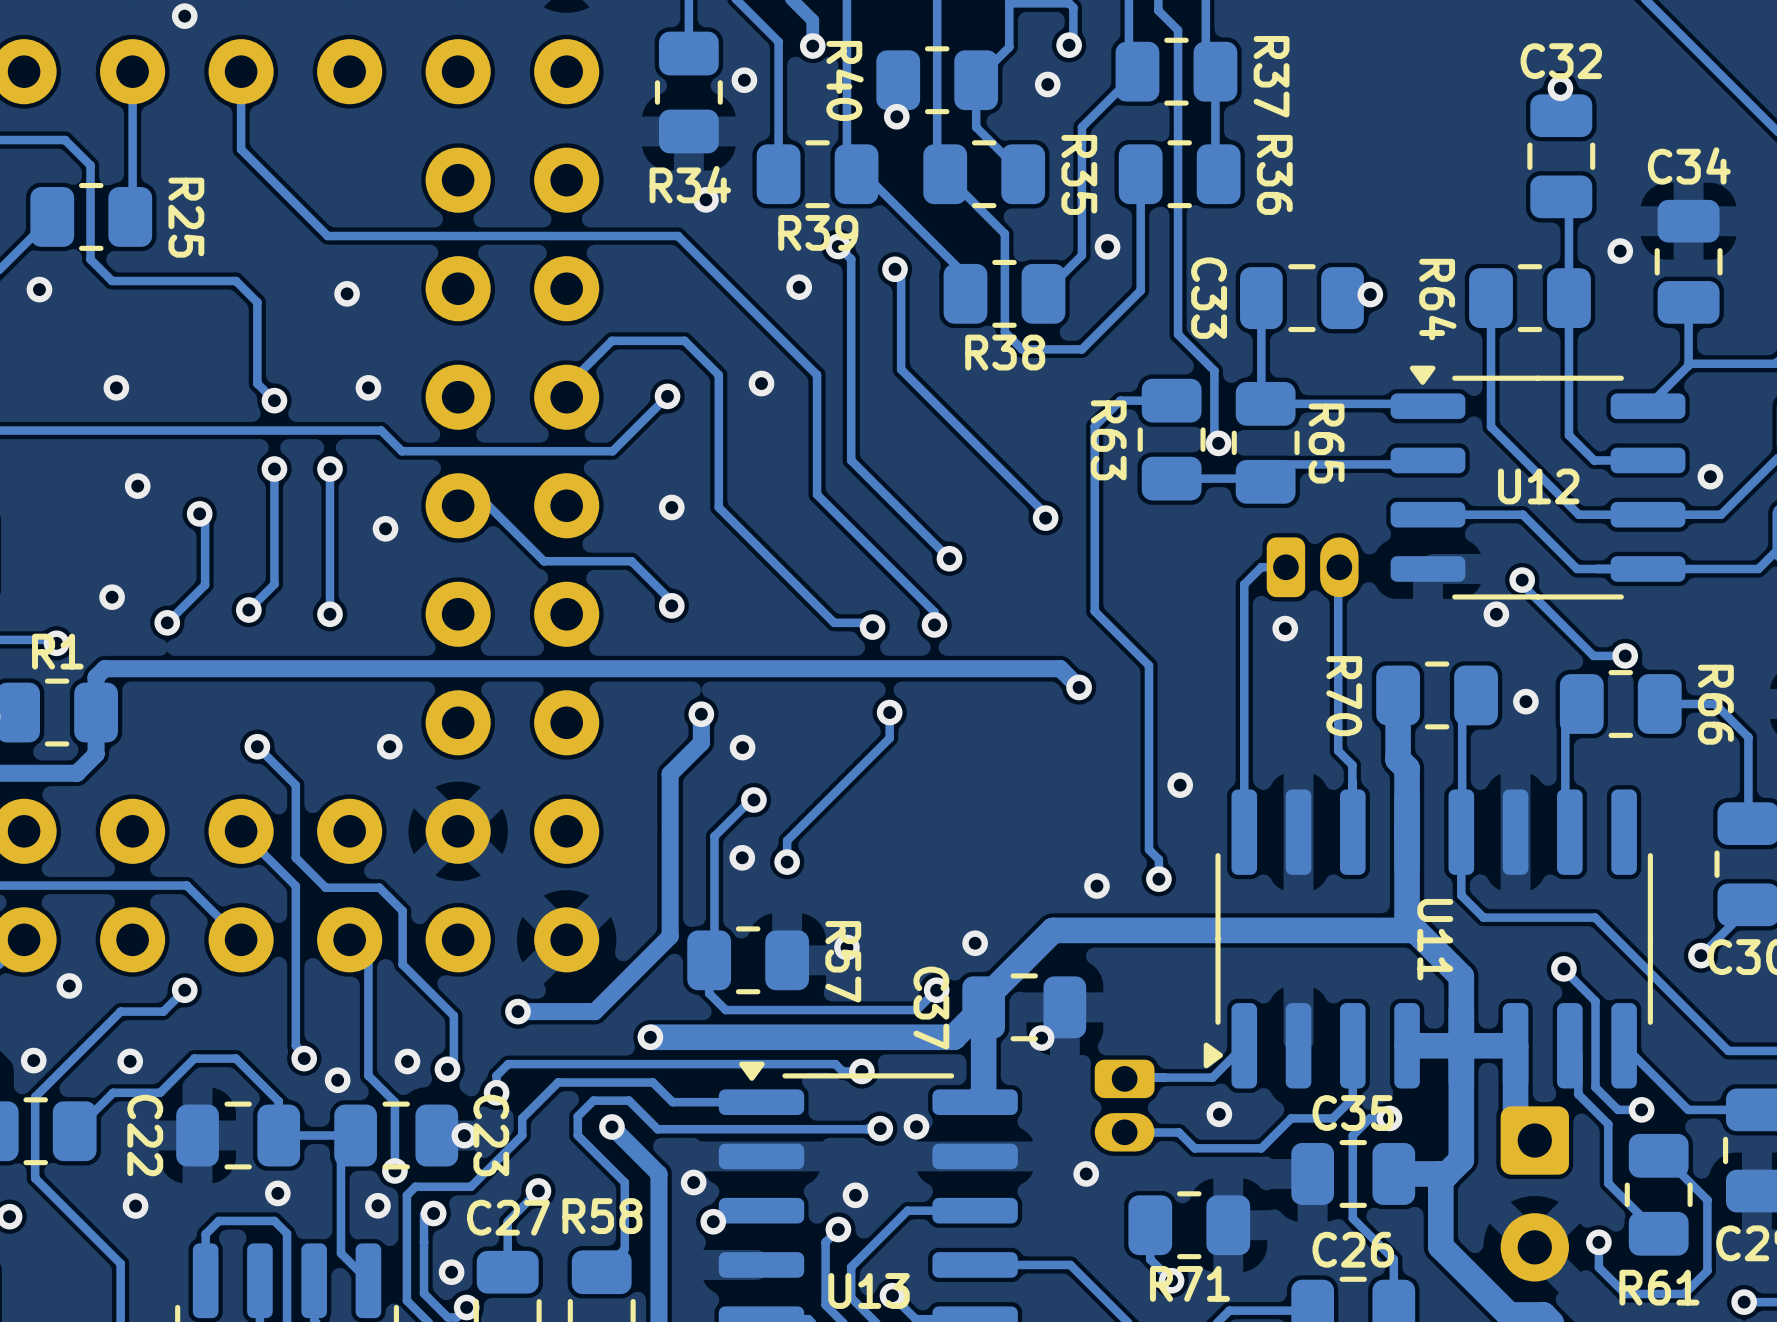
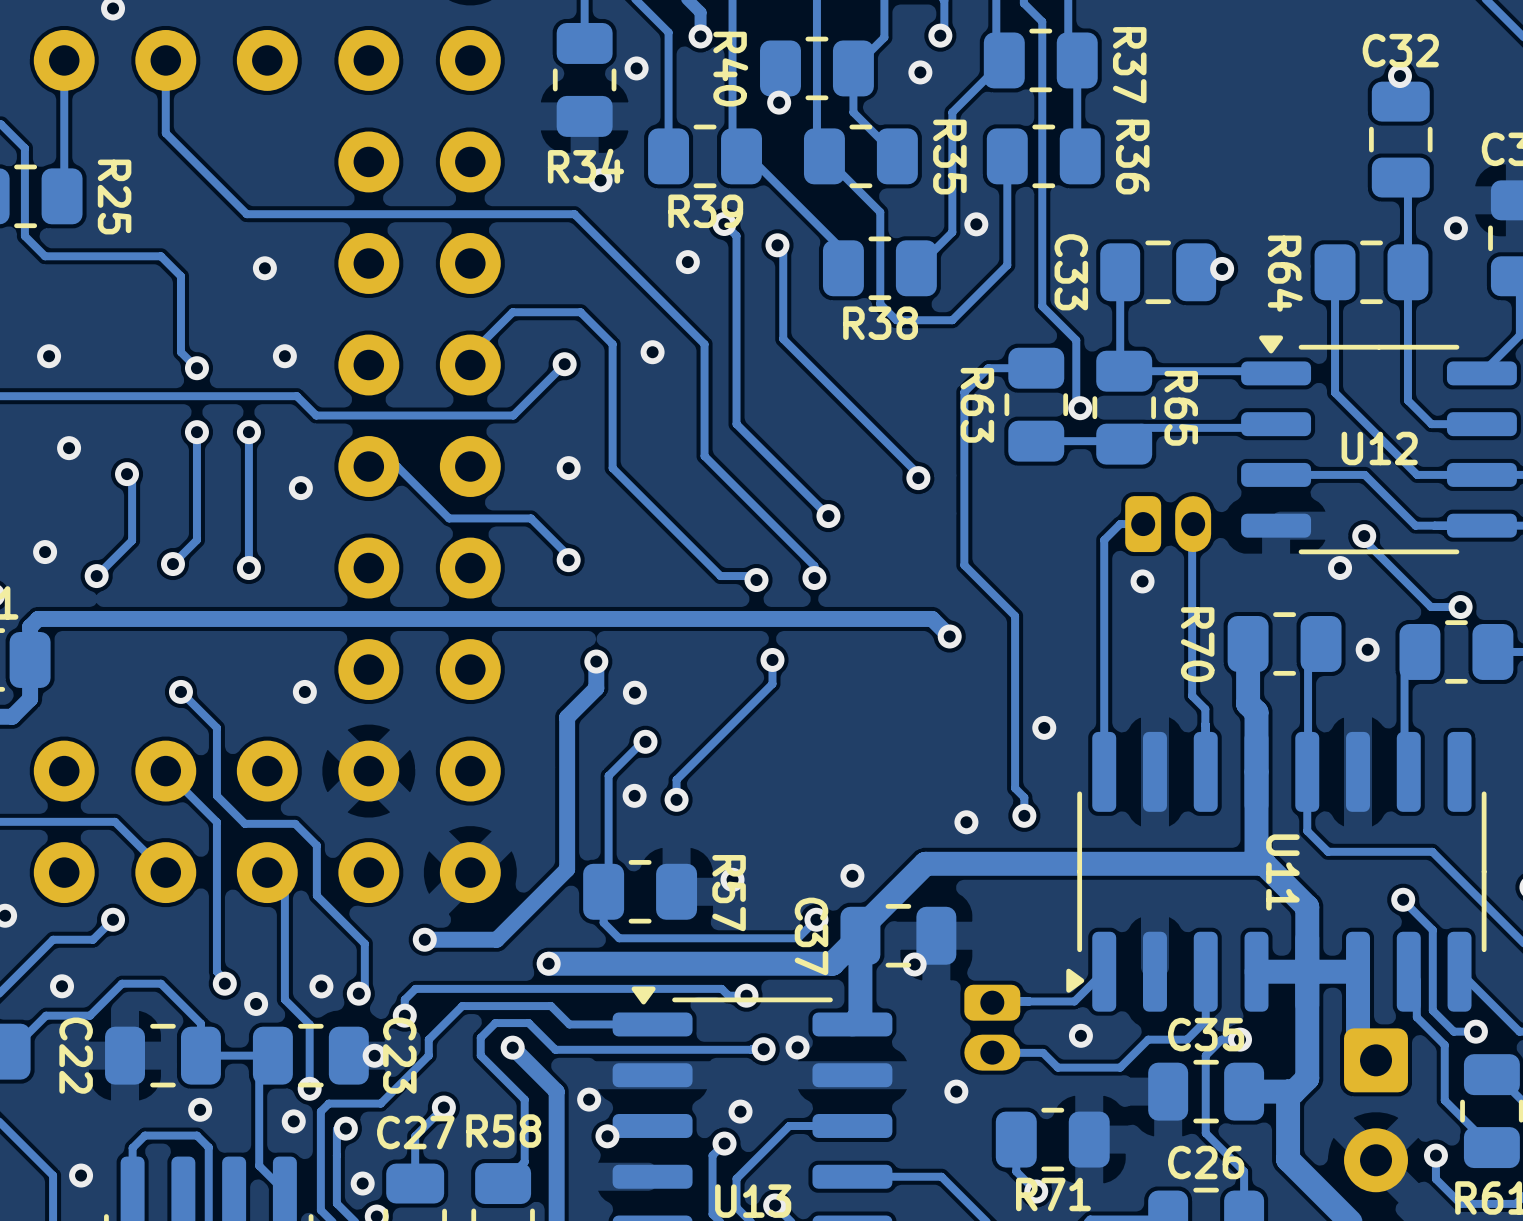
via position: (135, 1206) -> (81, 1175)

